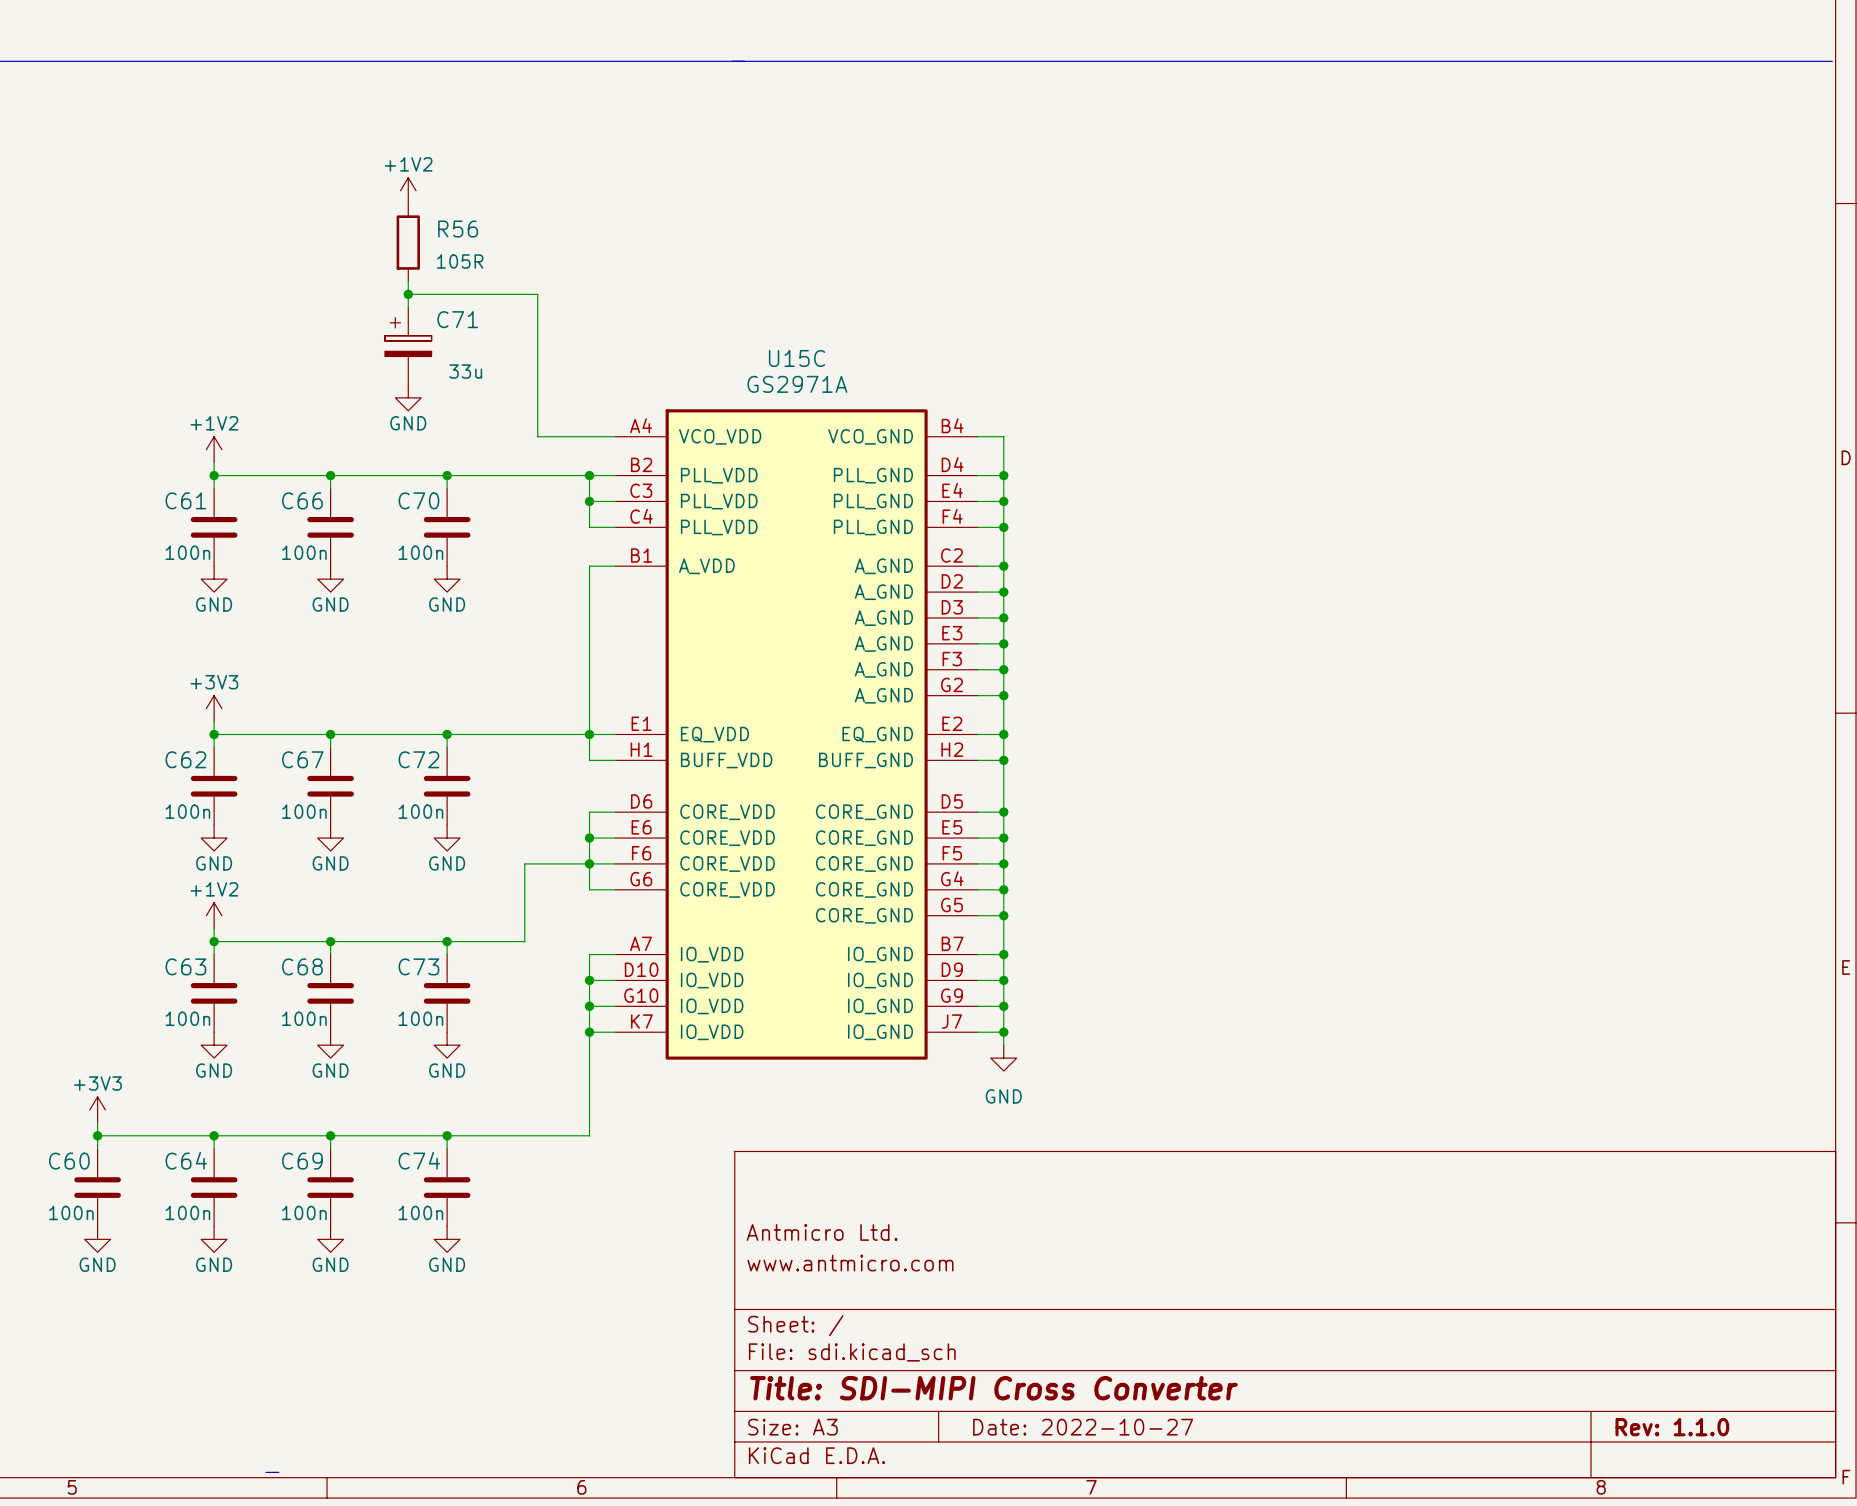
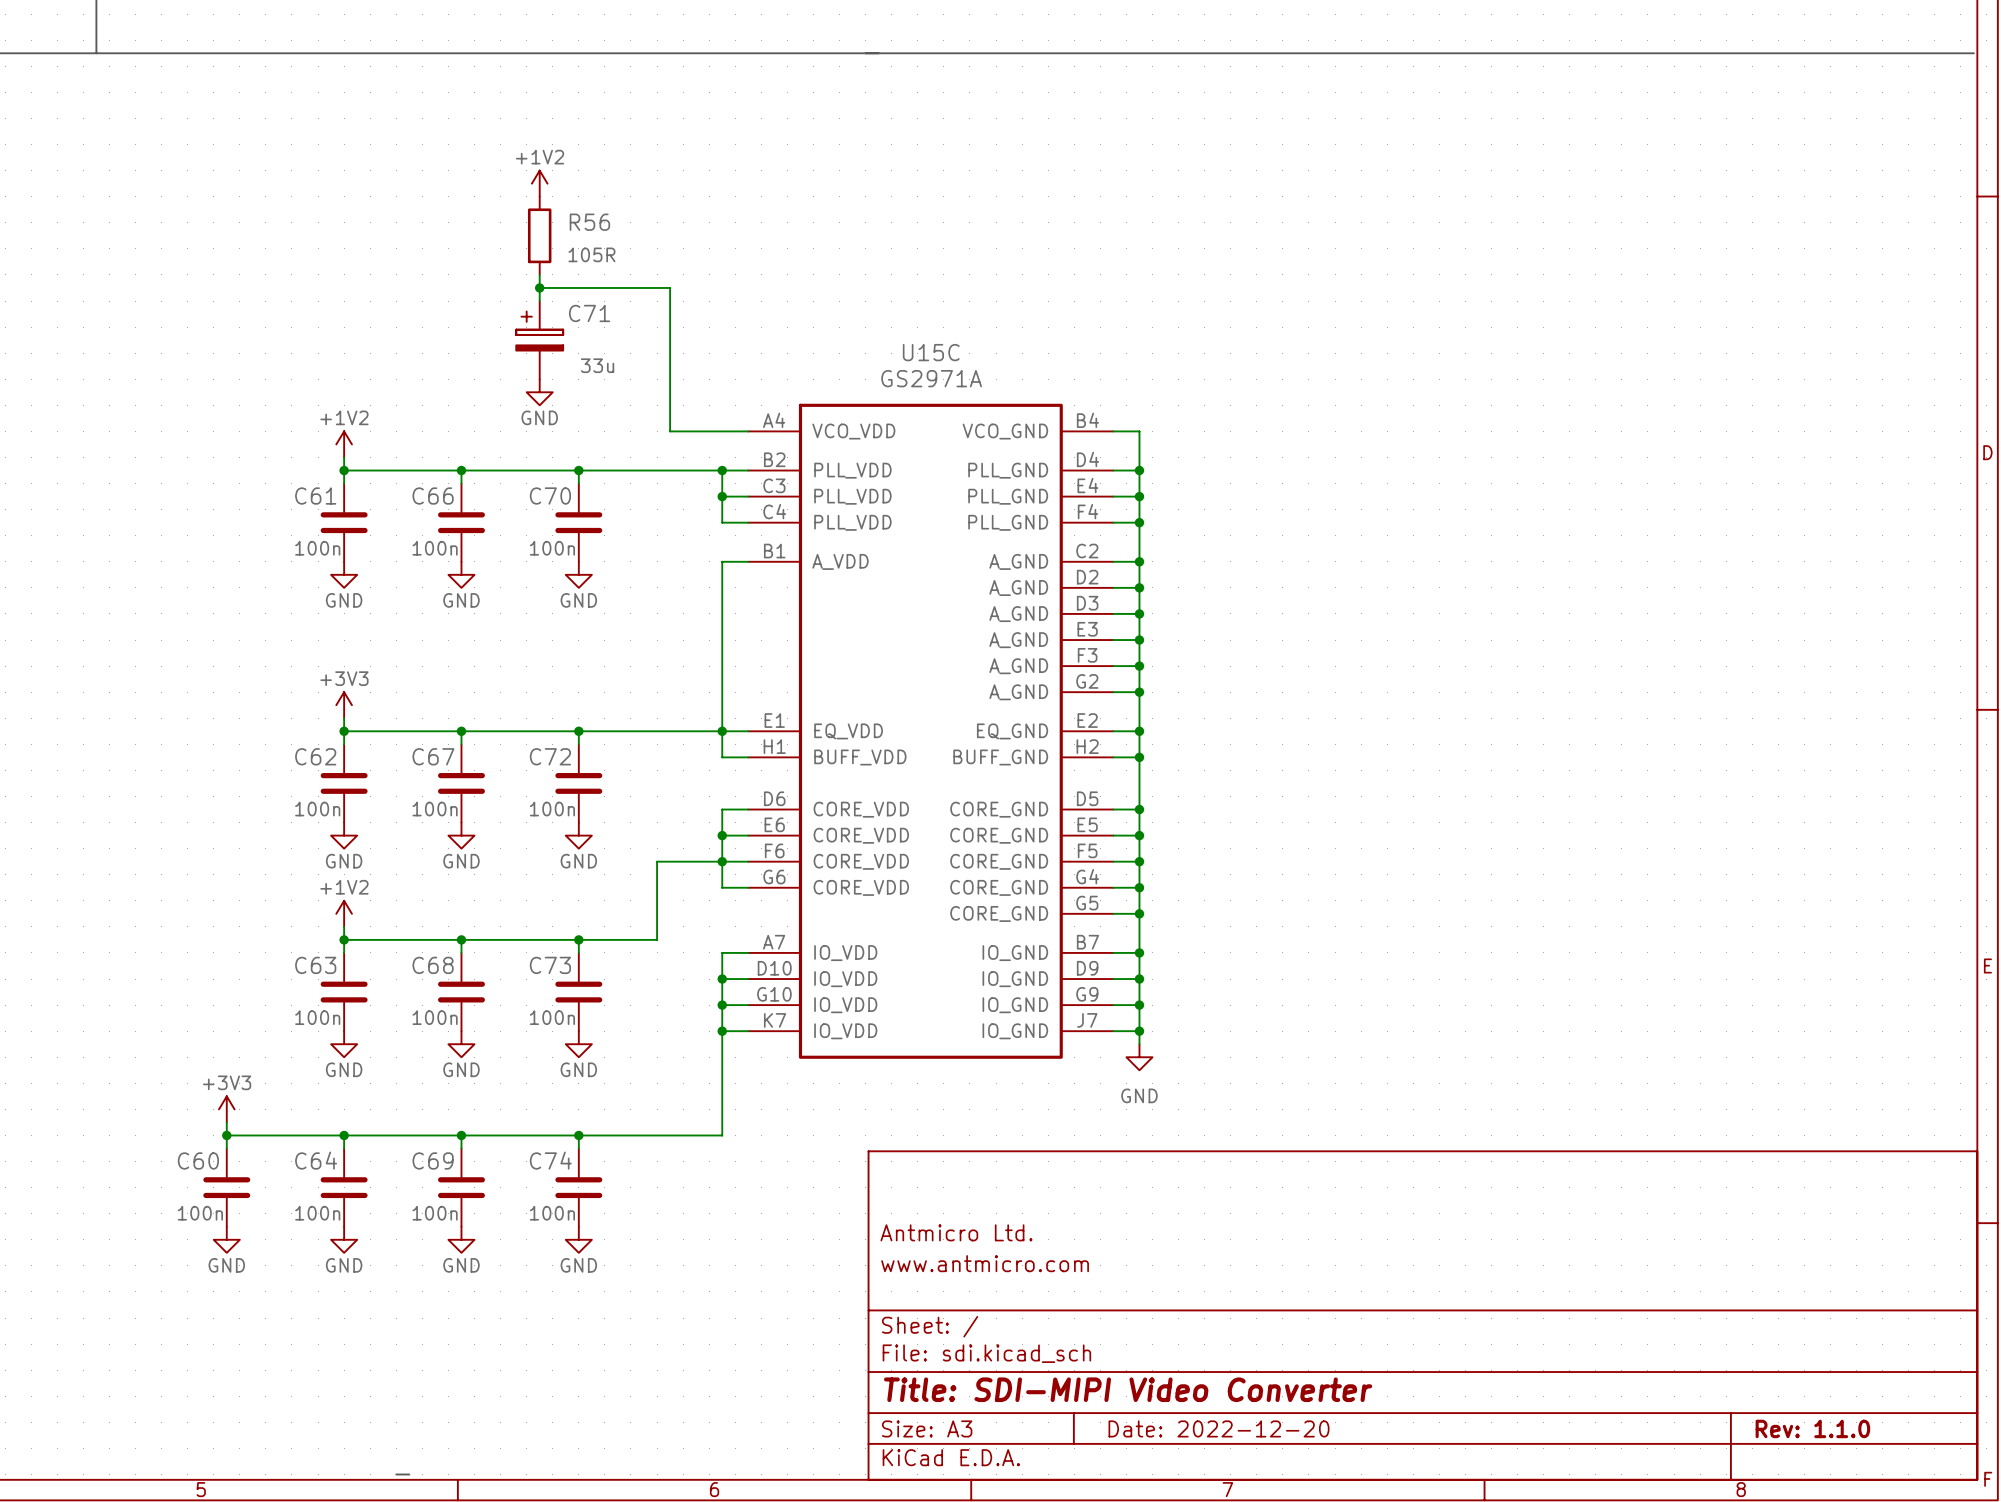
title block: Title: SDI-MIPI Cross Converter (993, 1388) -> Title: SDI-MIPI Video Converter (1128, 1389)
title block: Date: 2022-10-27 (1083, 1427) -> Date: 2022-12-20 (1219, 1428)

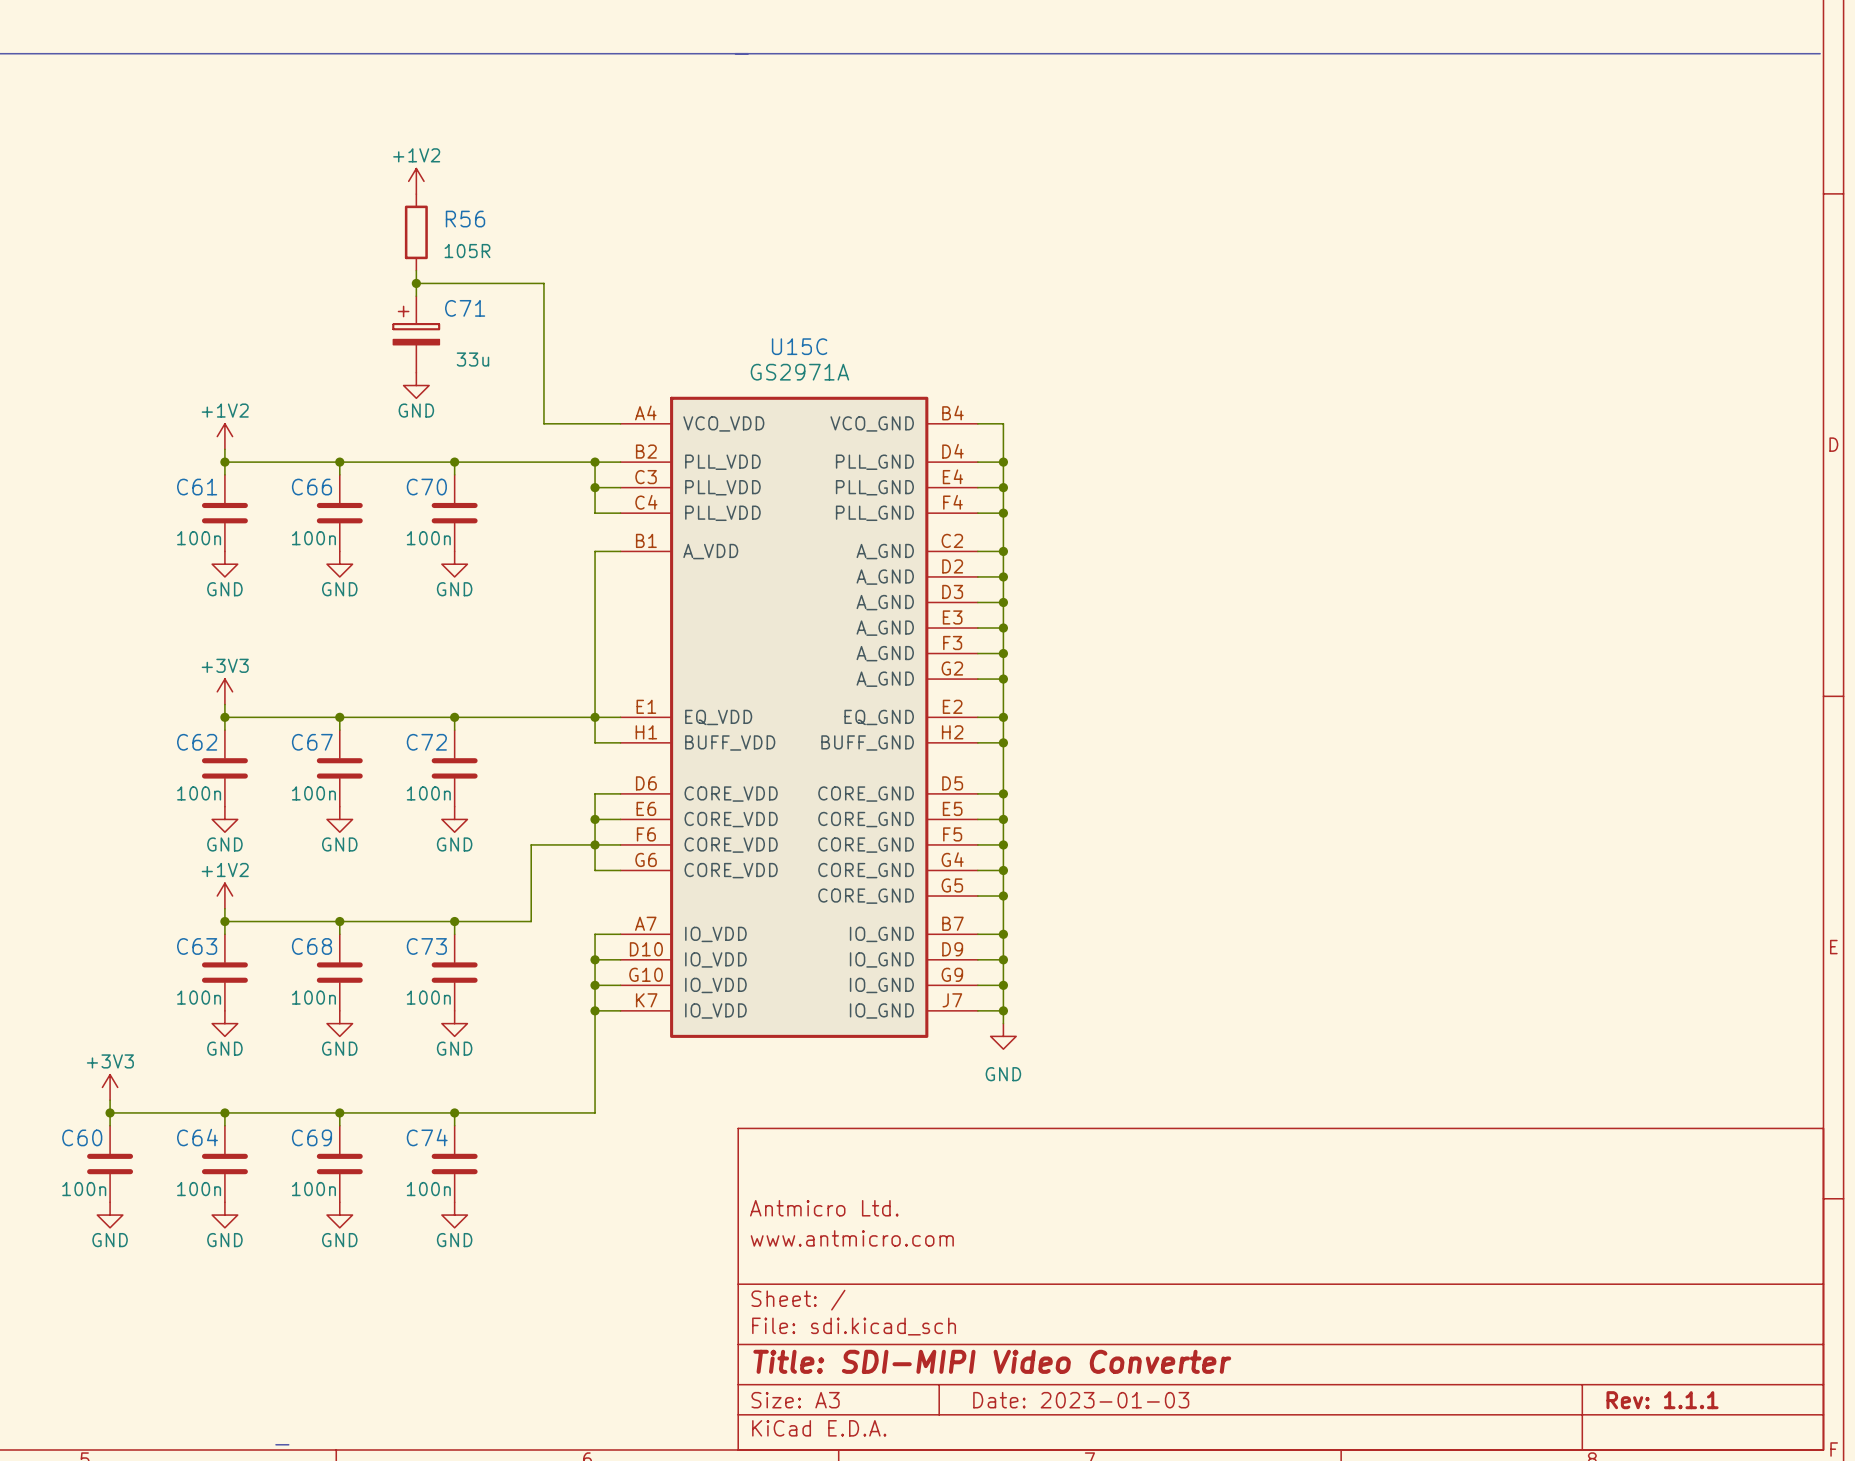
title block: Date: 2022-12-20 (1219, 1428) -> Date: 2023-01-03 (1081, 1400)
title block: Rev: 1.1.0 (1812, 1428) -> Rev: 1.1.1 (1662, 1400)

